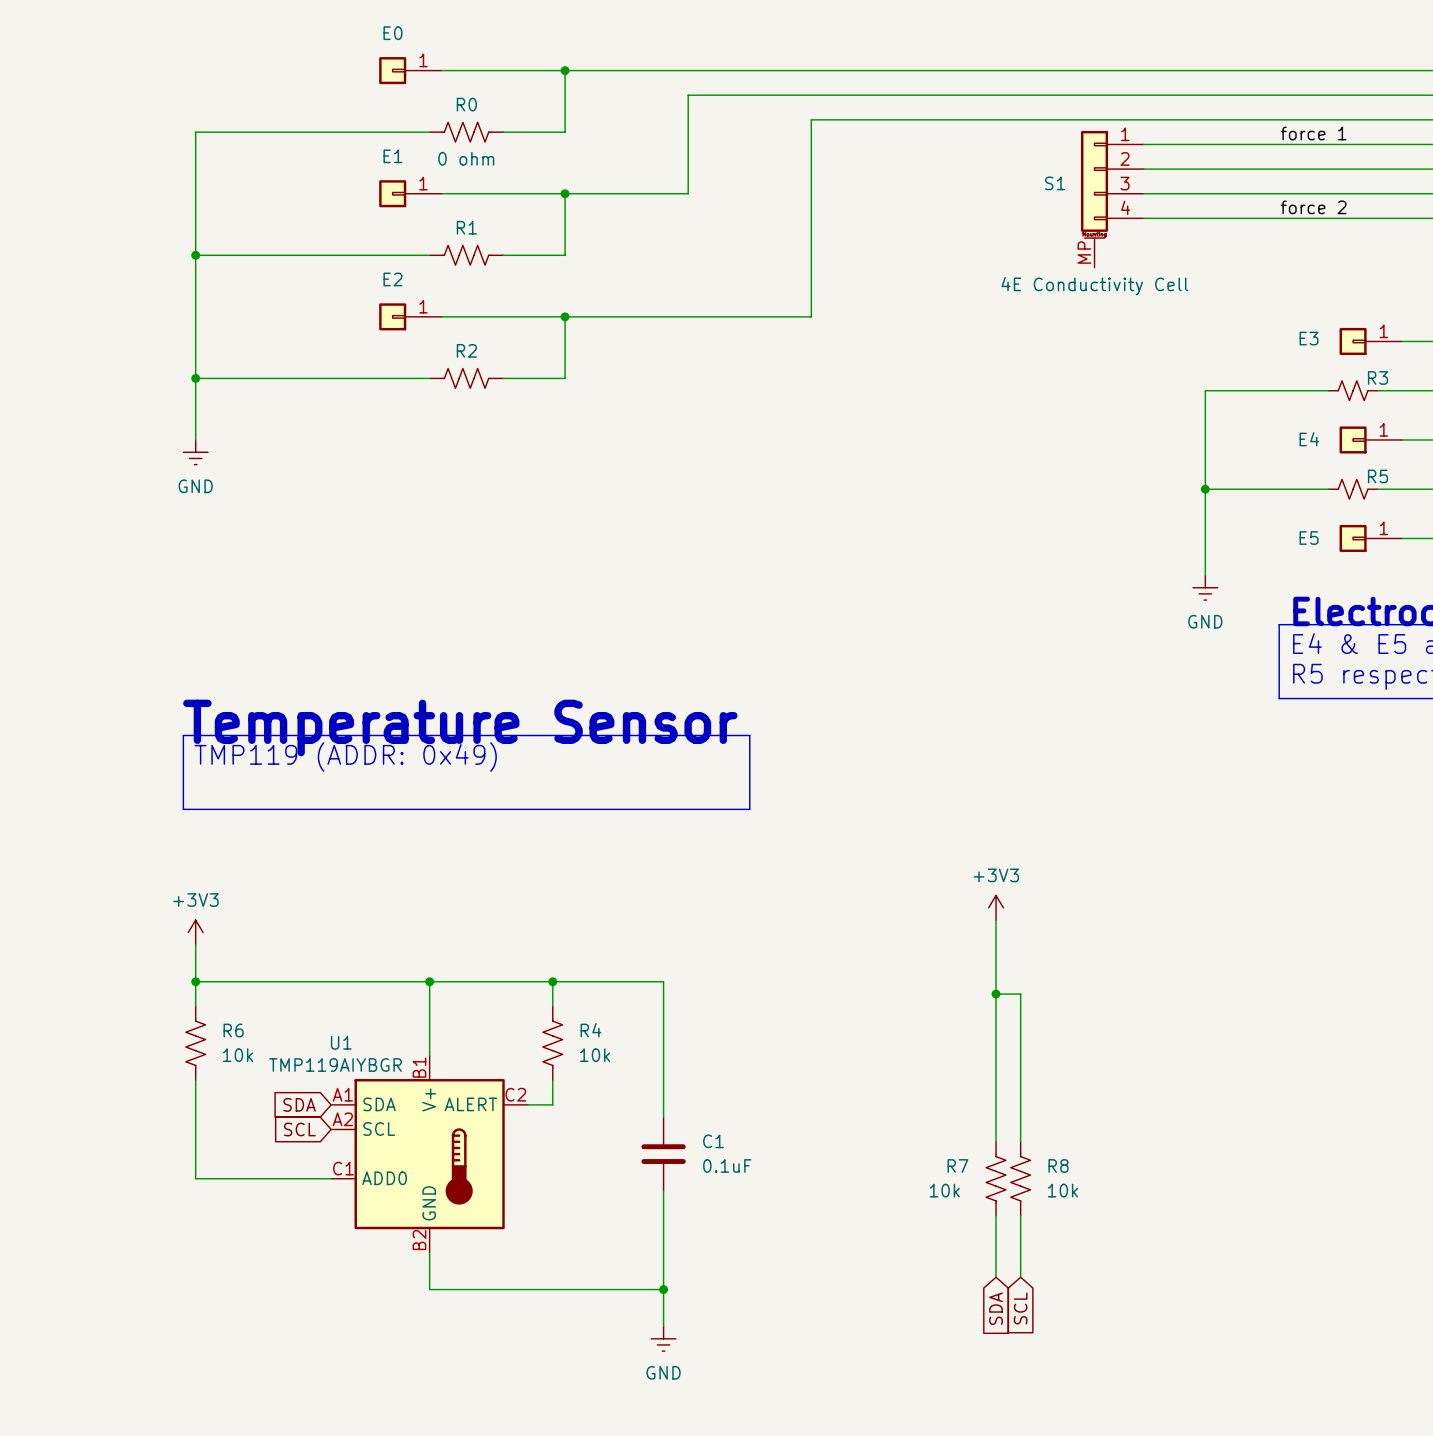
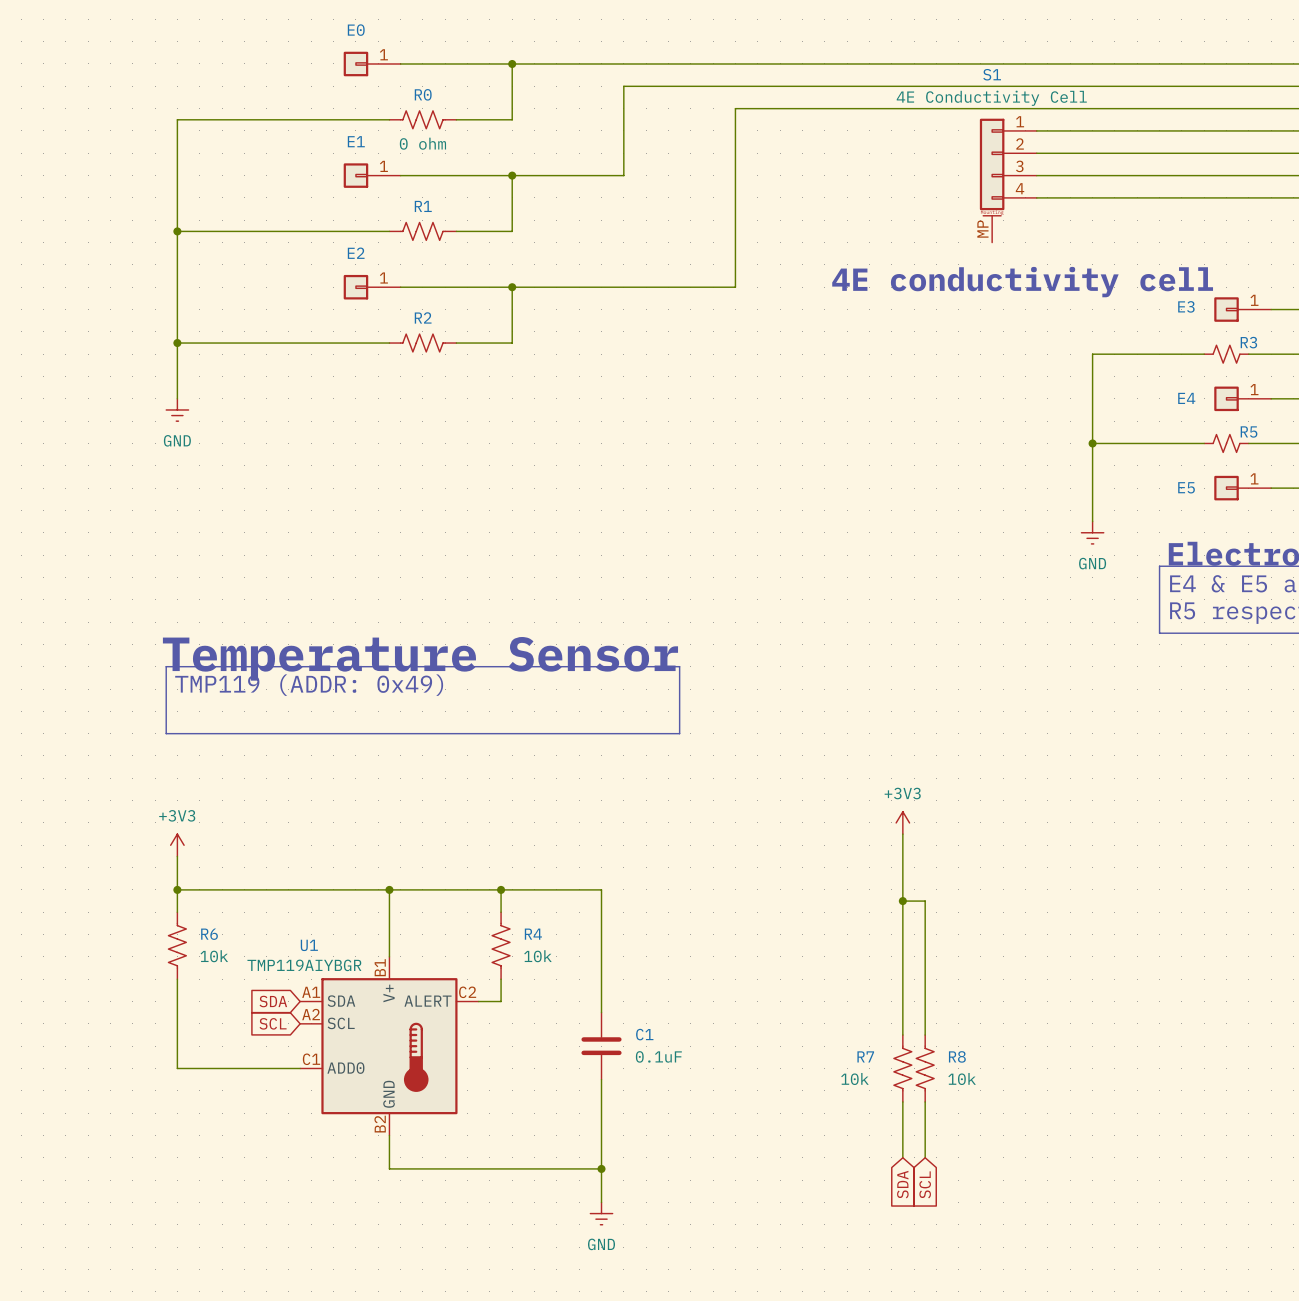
label: force 1 (1313, 133) -> none
S1 name position: S1 (1055, 183) -> S1 (992, 74)
label: force 2 (1313, 207) -> none
S1 value position: 4E Conductivity Cell (1094, 286) -> 4E Conductivity Cell (991, 98)
text: none -> 4E conductivity cell (1022, 282)

